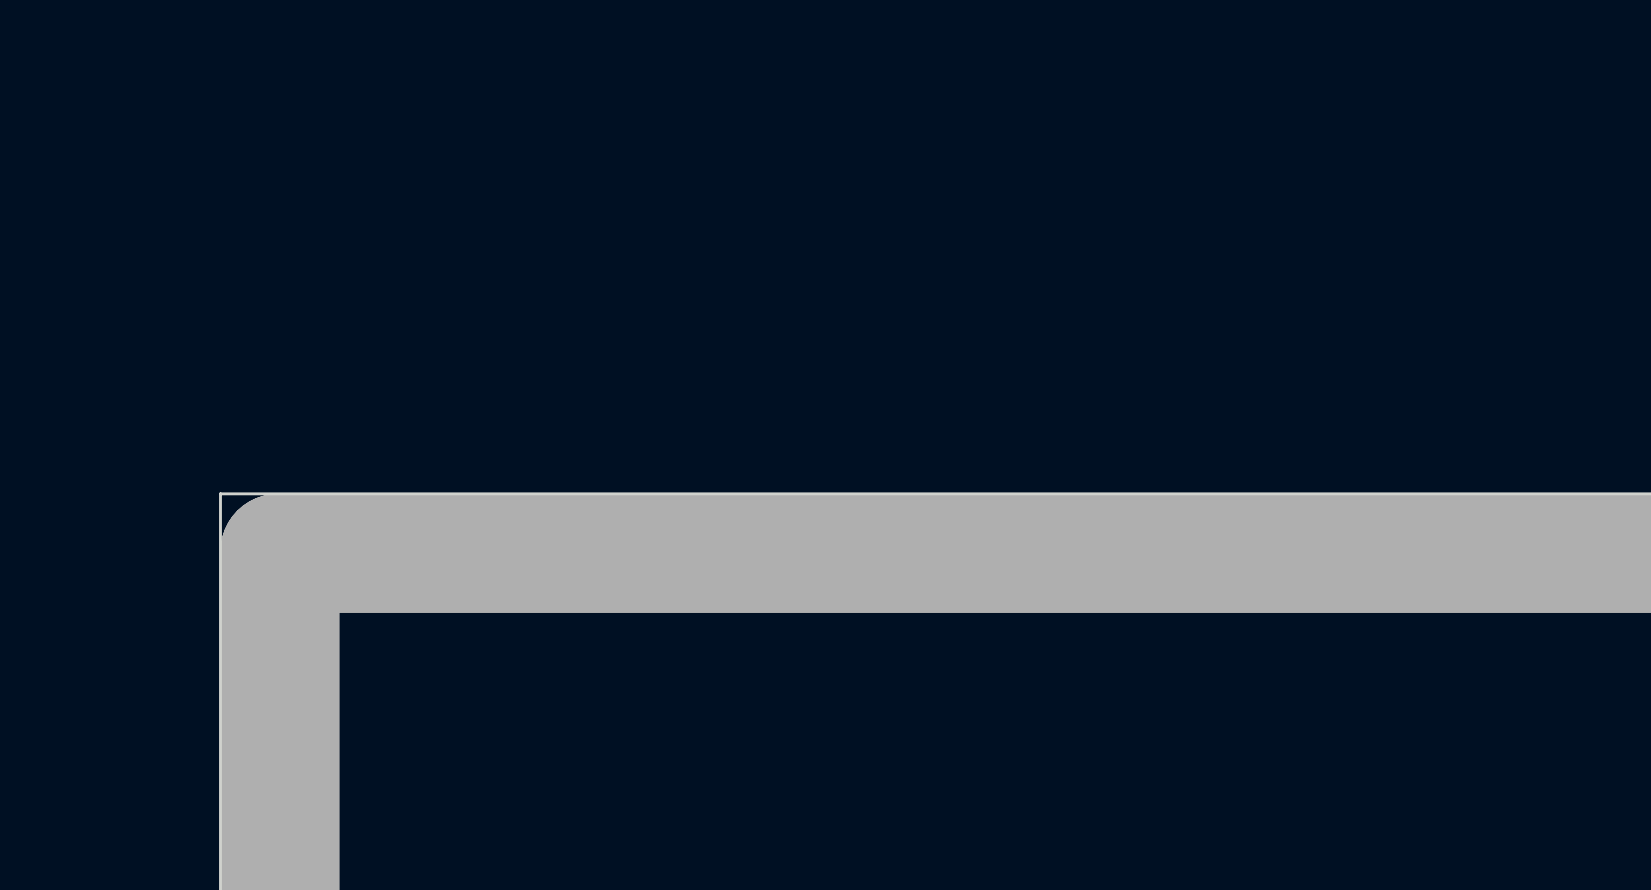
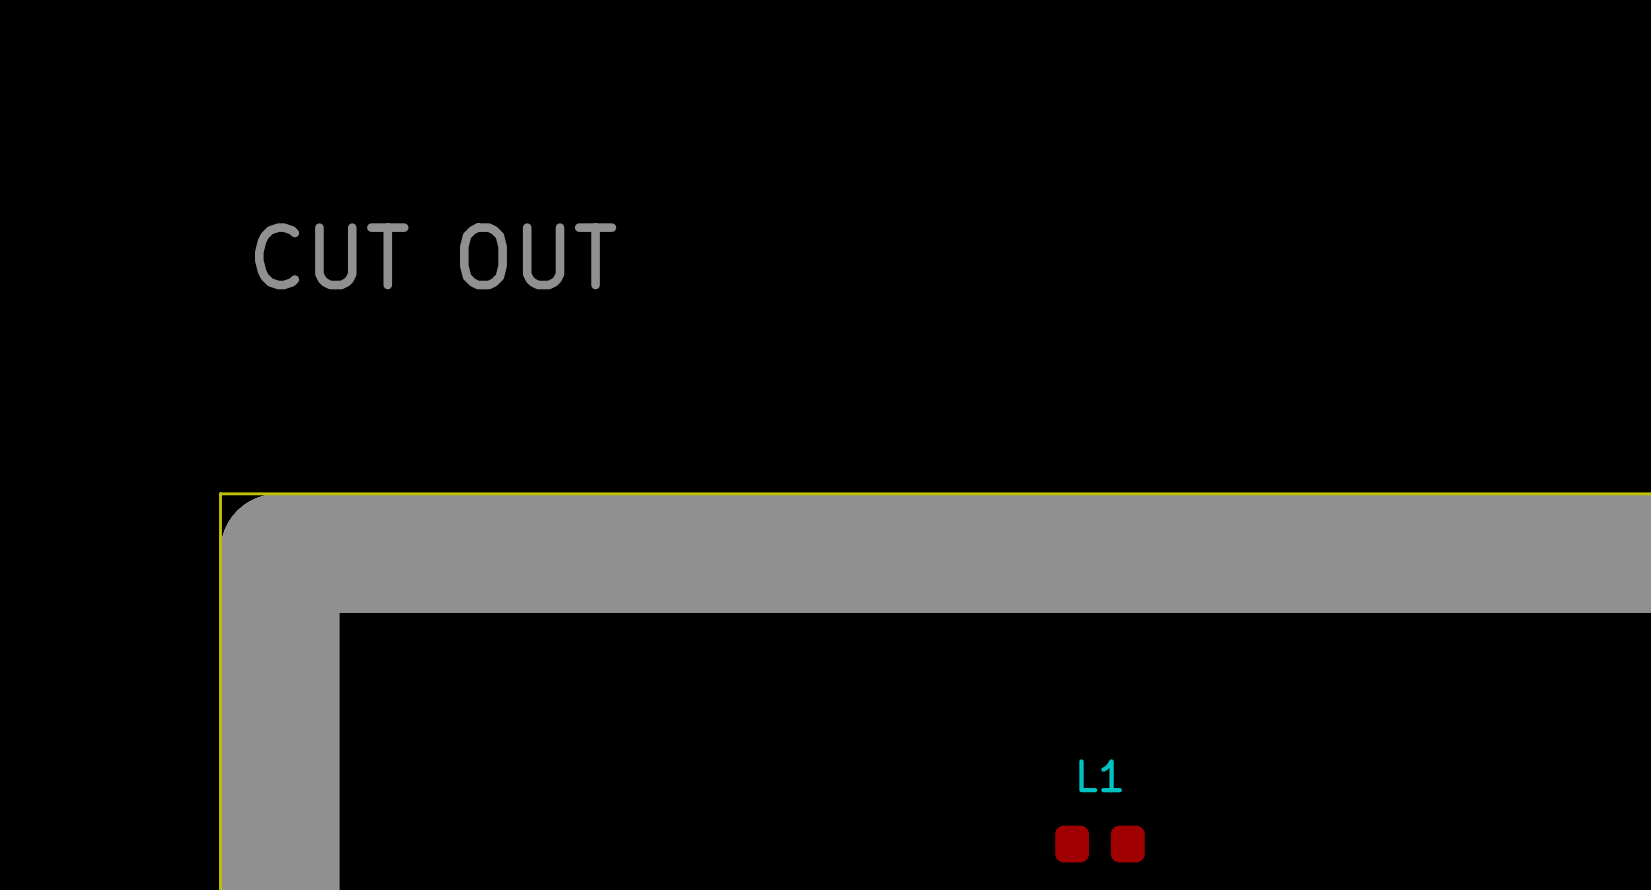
text: none -> CUT OUT (435, 256)
L1: none -> (1099, 844)

